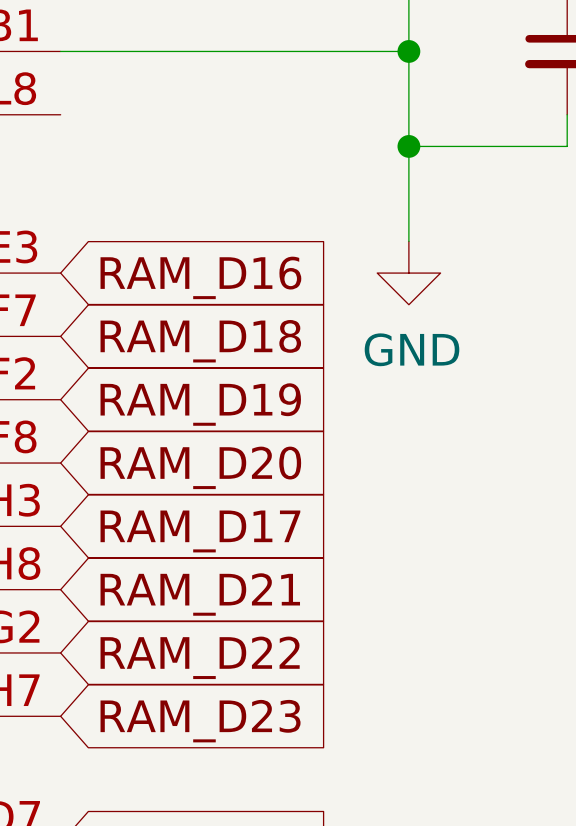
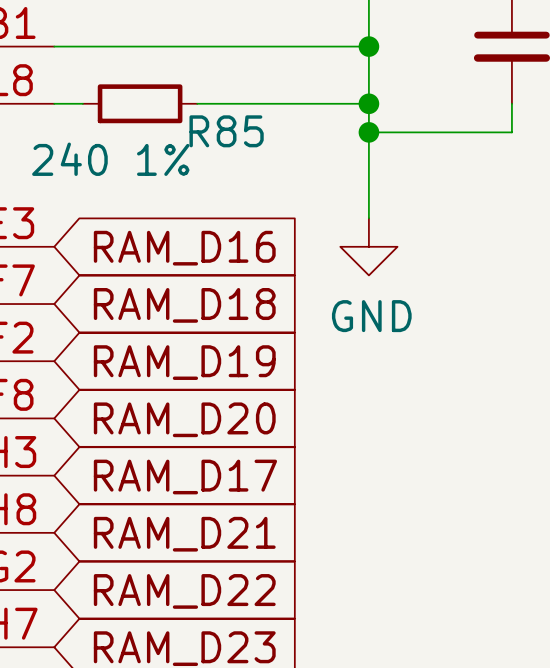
wire: none -> (54, 103) (82, 103)
R85: none -> 240 1% (140, 103)
wire: none -> (197, 103) (368, 103)
junction: none -> (368, 103)

